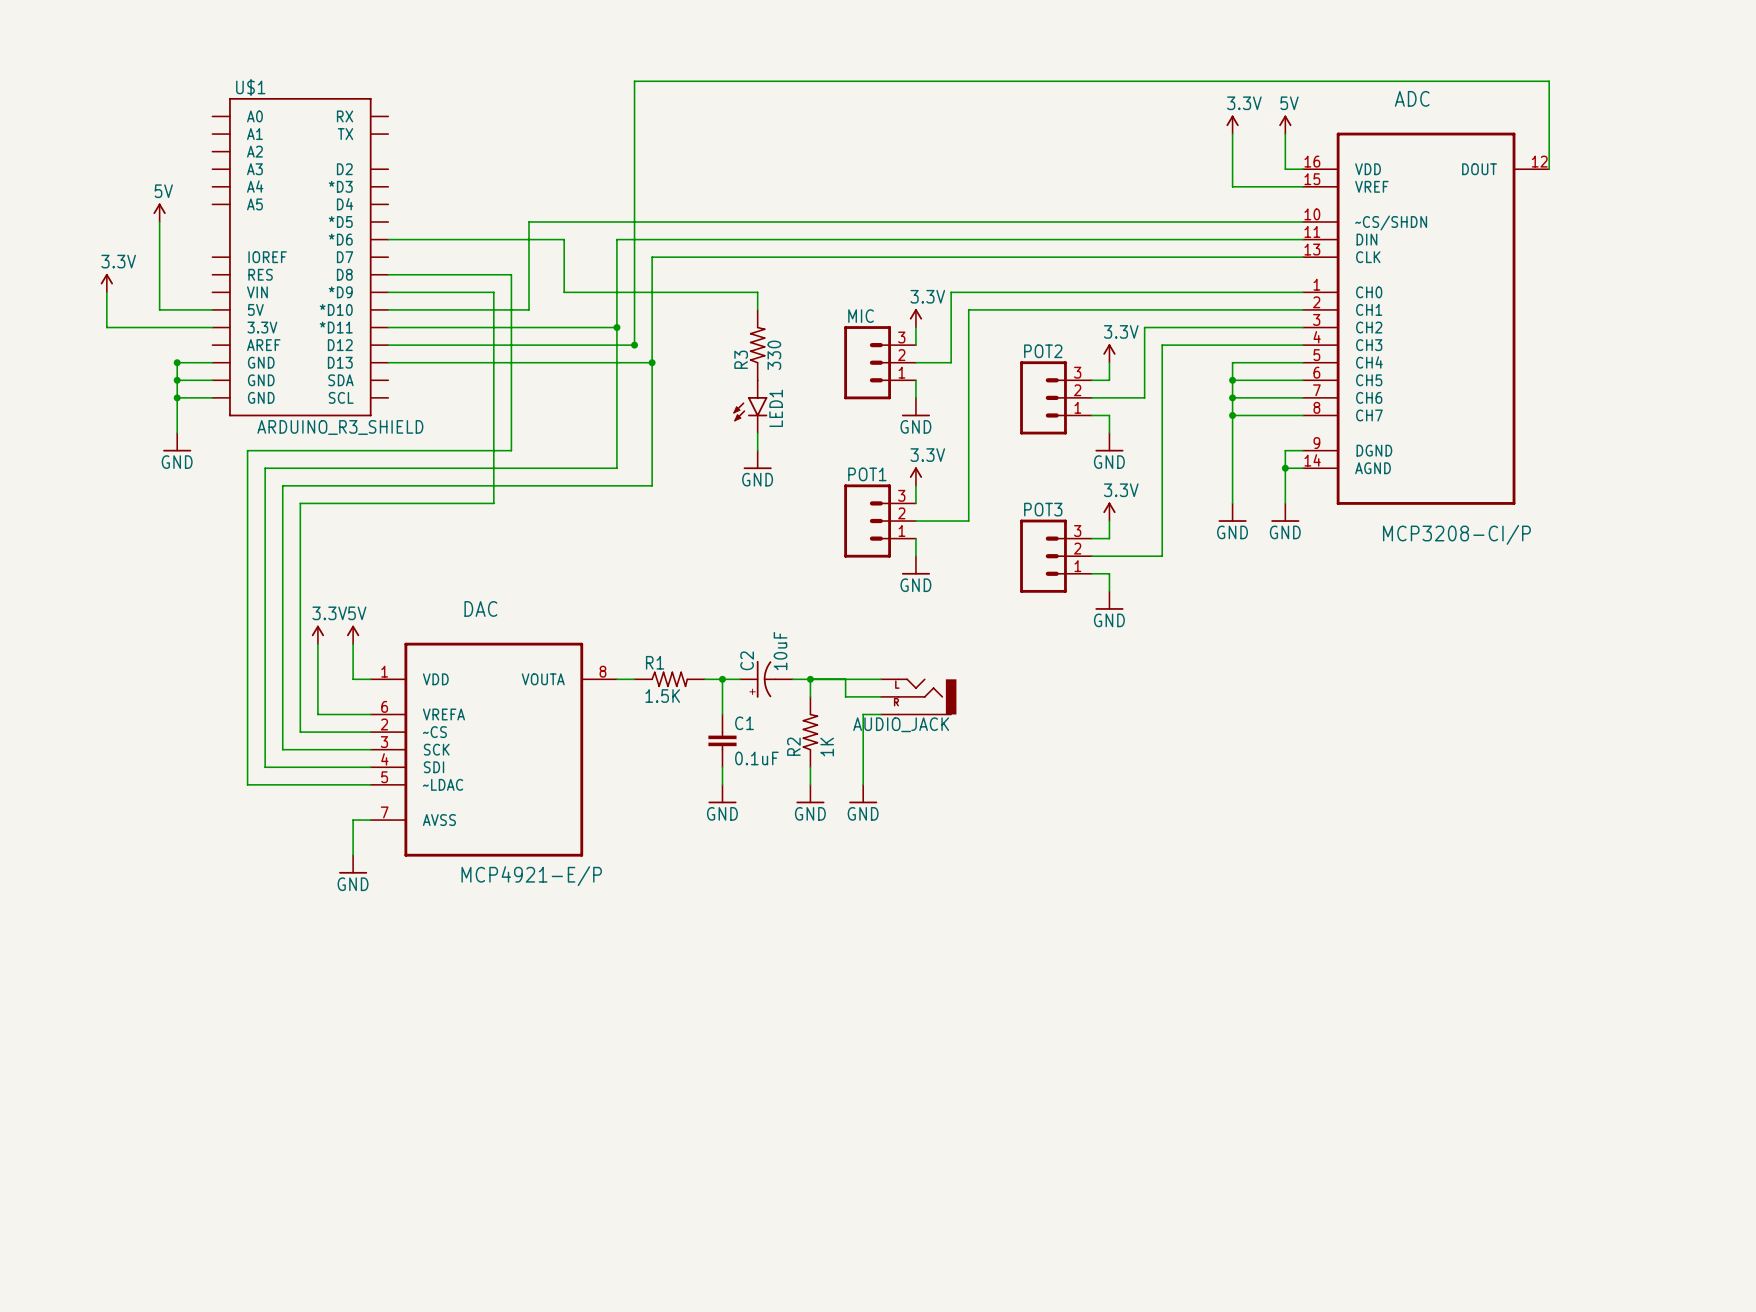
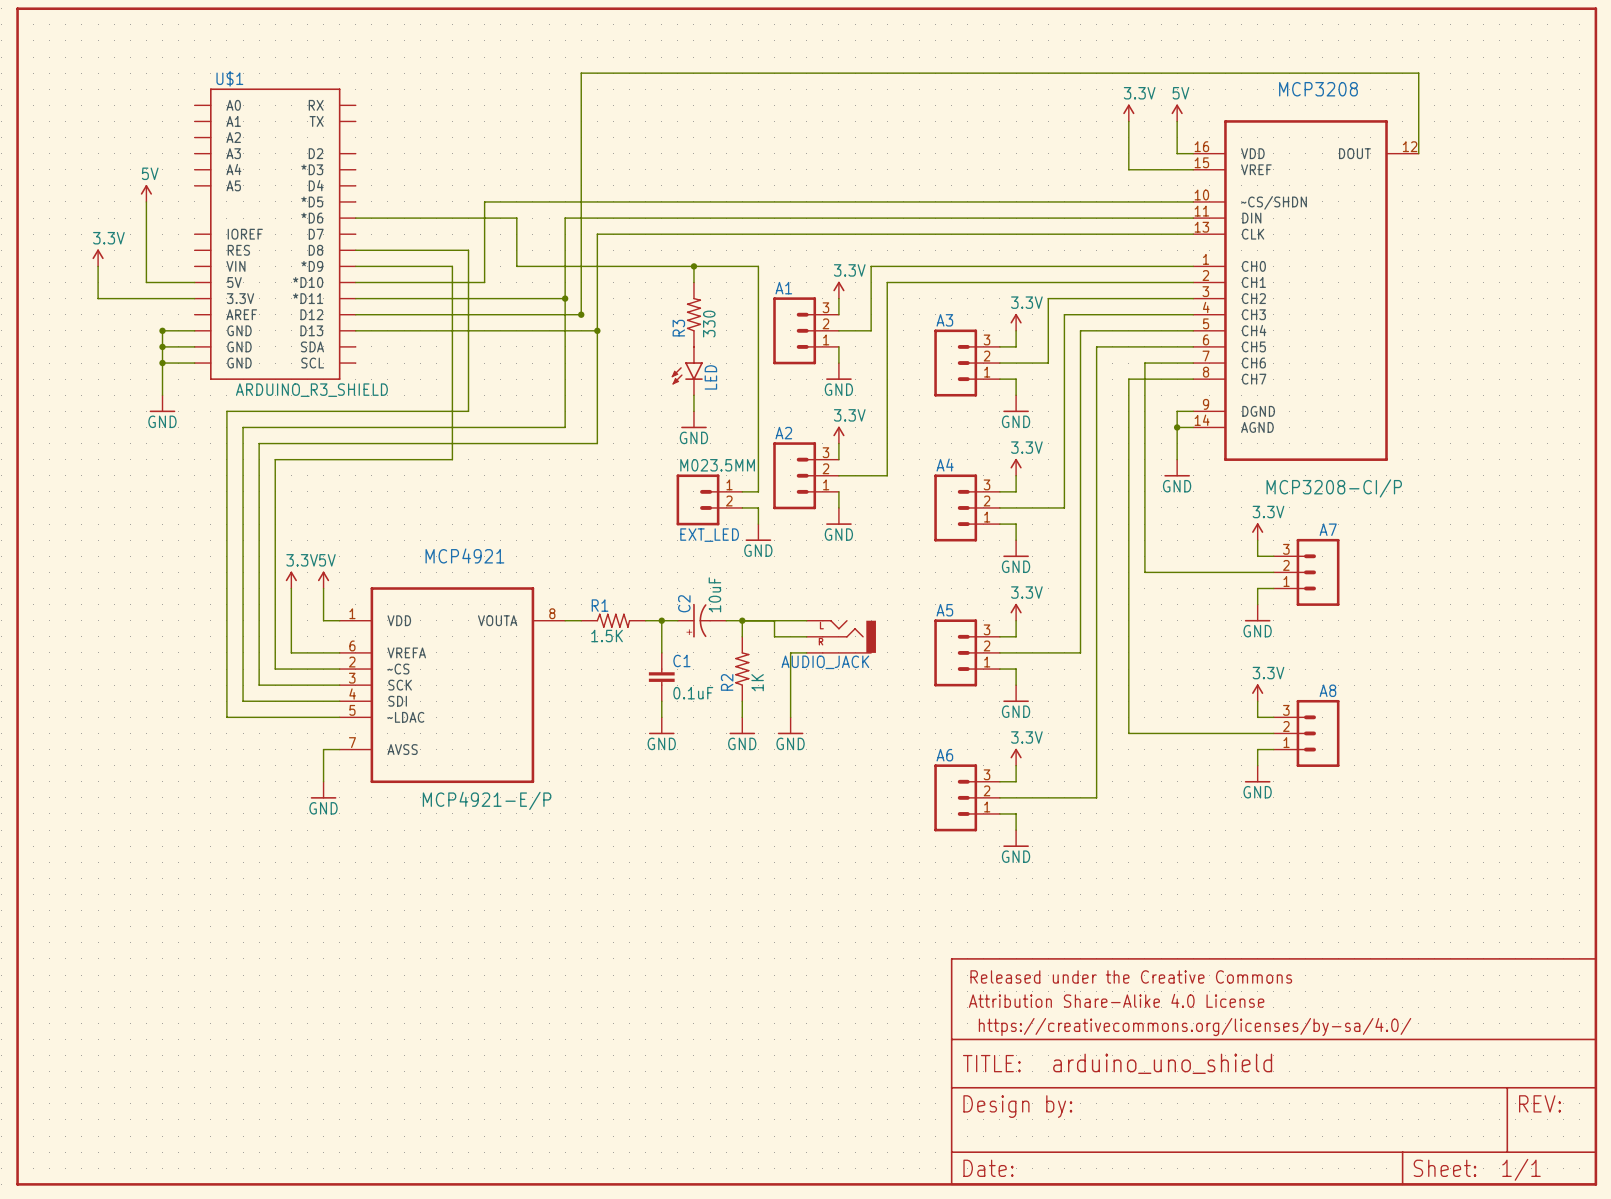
ADC name: ADC (1412, 98) -> MCP3208 (1318, 89)
wire: none -> (693, 266) (758, 266) (758, 491) (742, 491)
junction: none -> (693, 266)
MIC name: MIC (861, 316) -> A1 (783, 288)
POT2 name: POT2 (1043, 351) -> A3 (944, 320)
wire: (1232, 362) (1232, 415) -> (1128, 330) (1080, 330) (1080, 652) (999, 652)
wire: none -> (1128, 346) (1096, 346) (1096, 797) (999, 797)
junction: (1232, 380) -> none
wire: (1232, 397) (1250, 397) -> (1273, 572) (1144, 572) (1144, 363)
junction: (1232, 397) -> none
LED1 name: LED1 (776, 408) -> LED (710, 377)
junction: (1232, 415) -> none
POT1 name: POT1 (867, 474) -> A2 (783, 433)
wire: none -> (1128, 459) (1128, 733) (1273, 733)
POT3 name: POT3 (1043, 509) -> A4 (945, 465)
power symbol: GND (1232, 512) -> none
EXT_LED: none -> M023.5MM (709, 499)
wire: none -> (742, 507) (758, 507) (758, 524)
power symbol: none -> 3.3V (1257, 531)
power symbol: none -> GND (758, 532)
wire: none -> (1257, 540) (1257, 556) (1273, 556)
DAC name: DAC (480, 608) -> MCP4921 (464, 555)
A7: none -> (1306, 572)
wire: none -> (1273, 588) (1257, 588) (1257, 604)
part: none -> (806, 596)
power symbol: none -> 3.3V (1016, 612)
power symbol: none -> GND (1257, 613)
wire: none -> (1016, 620) (1016, 636) (999, 636)
A5: none -> (967, 652)
wire: none -> (999, 669) (1016, 669) (1016, 685)
power symbol: none -> GND (1016, 693)
power symbol: none -> 3.3V (1257, 692)
wire: none -> (1257, 701) (1257, 717) (1273, 717)
A8: none -> (1306, 733)
wire: none -> (1273, 749) (1257, 749) (1257, 765)
power symbol: none -> 3.3V (1016, 757)
wire: none -> (1016, 765) (1016, 781) (999, 781)
power symbol: none -> GND (1257, 774)
A6: none -> (967, 797)
wire: none -> (999, 813) (1016, 813) (1016, 830)
power symbol: none -> GND (1016, 838)
part: none -> (1273, 1071)

